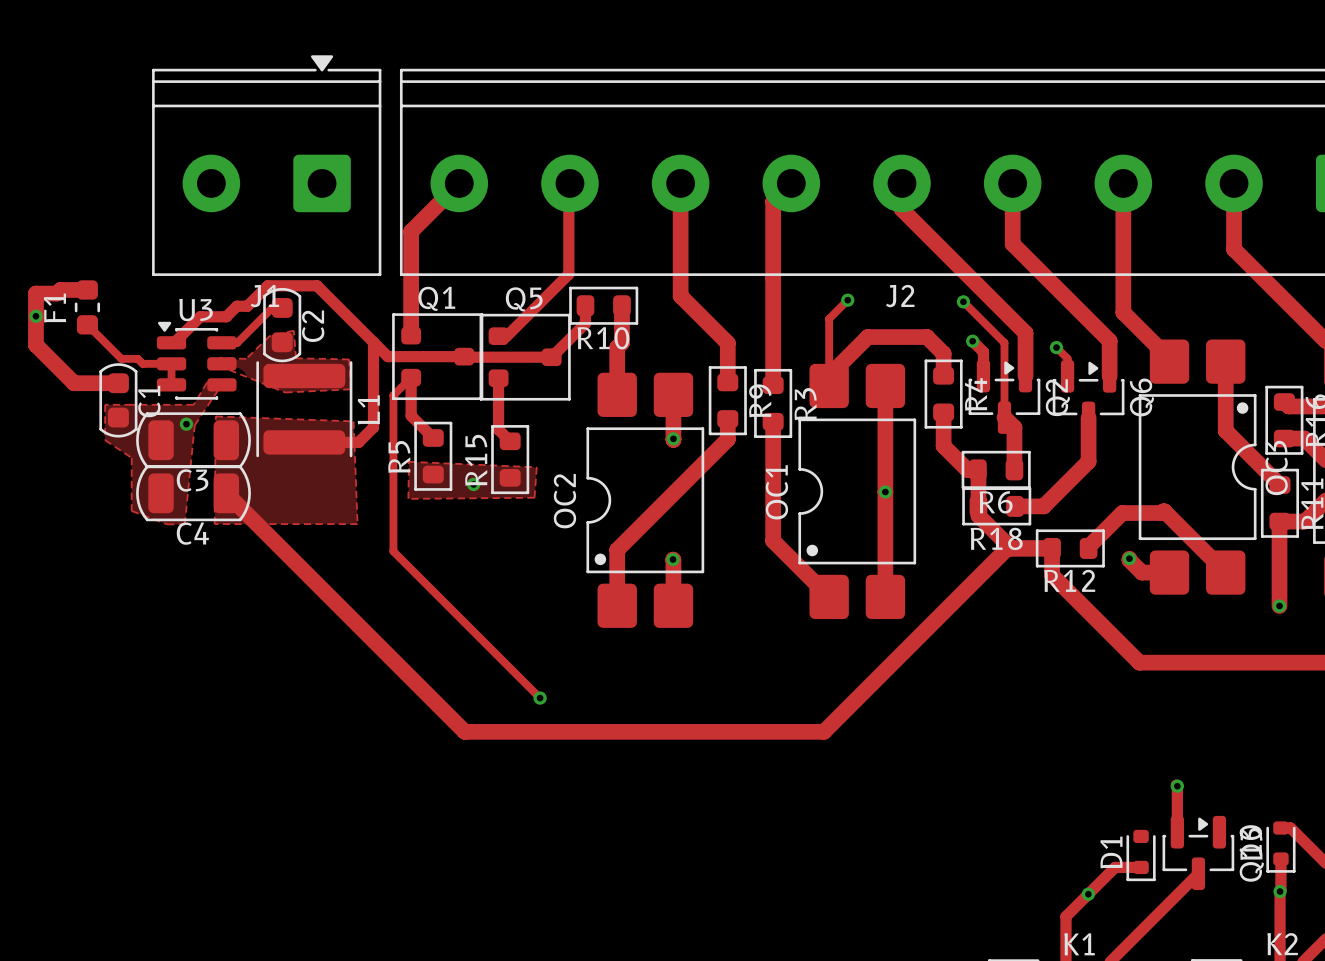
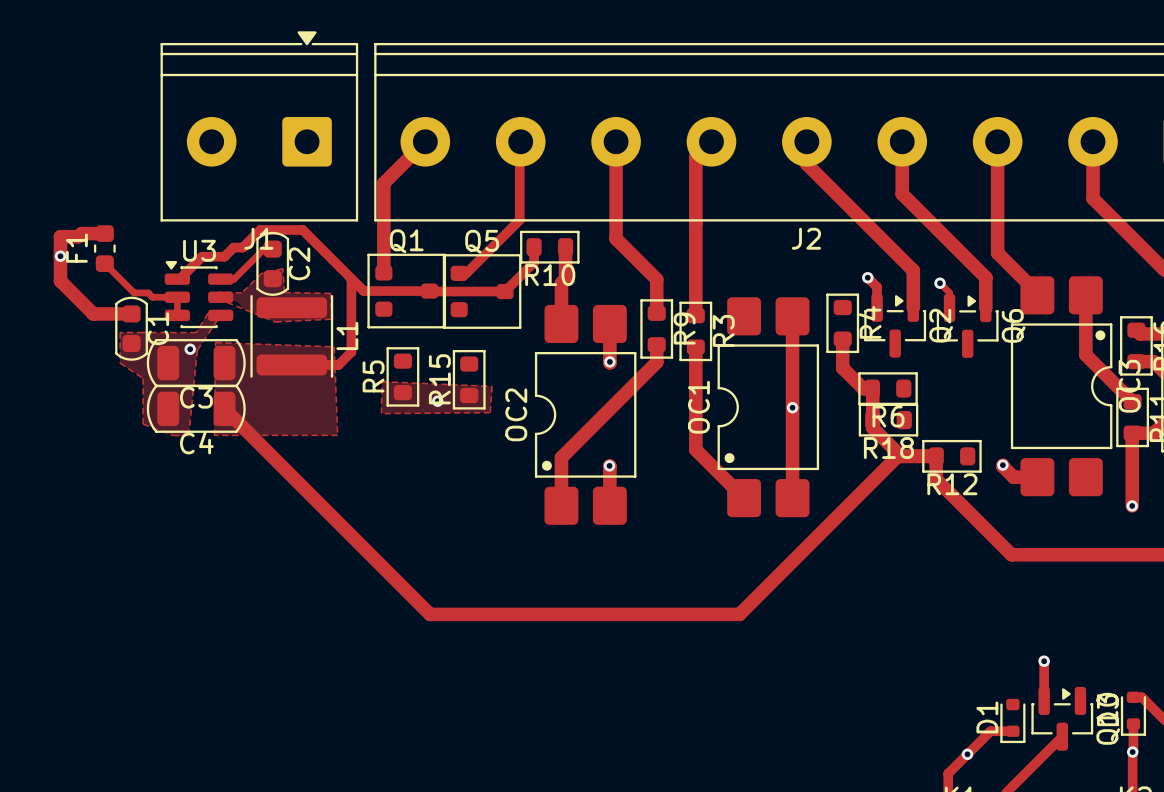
track: (847, 300) (829, 318) (829, 385) (829, 375) (867, 337) (927, 337) (943, 353) (943, 375) -> none
via: (847, 300) -> none
track: (963, 301) (1004, 342) (1004, 417) (1014, 427) (1014, 469) -> none
via: (963, 301) -> none
track: (498, 378) (498, 429) (510, 441) -> none
track: (1088, 417) (1088, 461) (1043, 506) (1015, 506) -> none
track: (433, 437) (411, 415) (411, 377) (393, 395) (393, 551) (540, 698) -> none
track: (1088, 548) (1122, 513) (1161, 513) (1164, 511) (1225, 572) -> none
via: (540, 698) -> none

